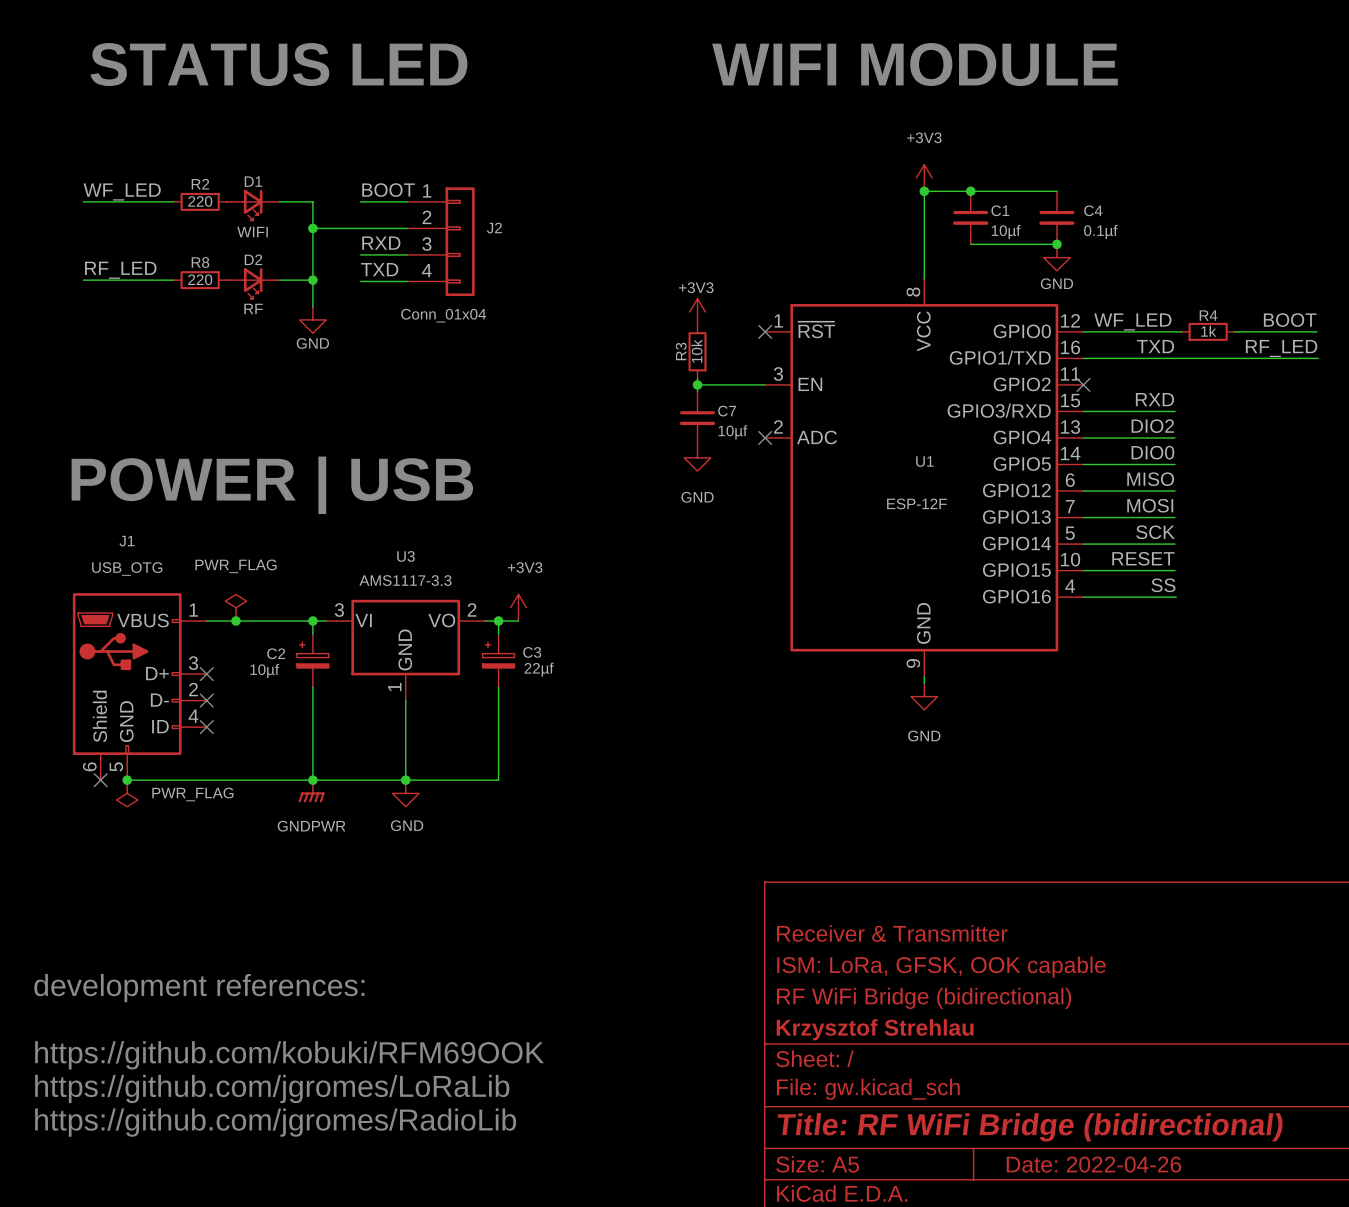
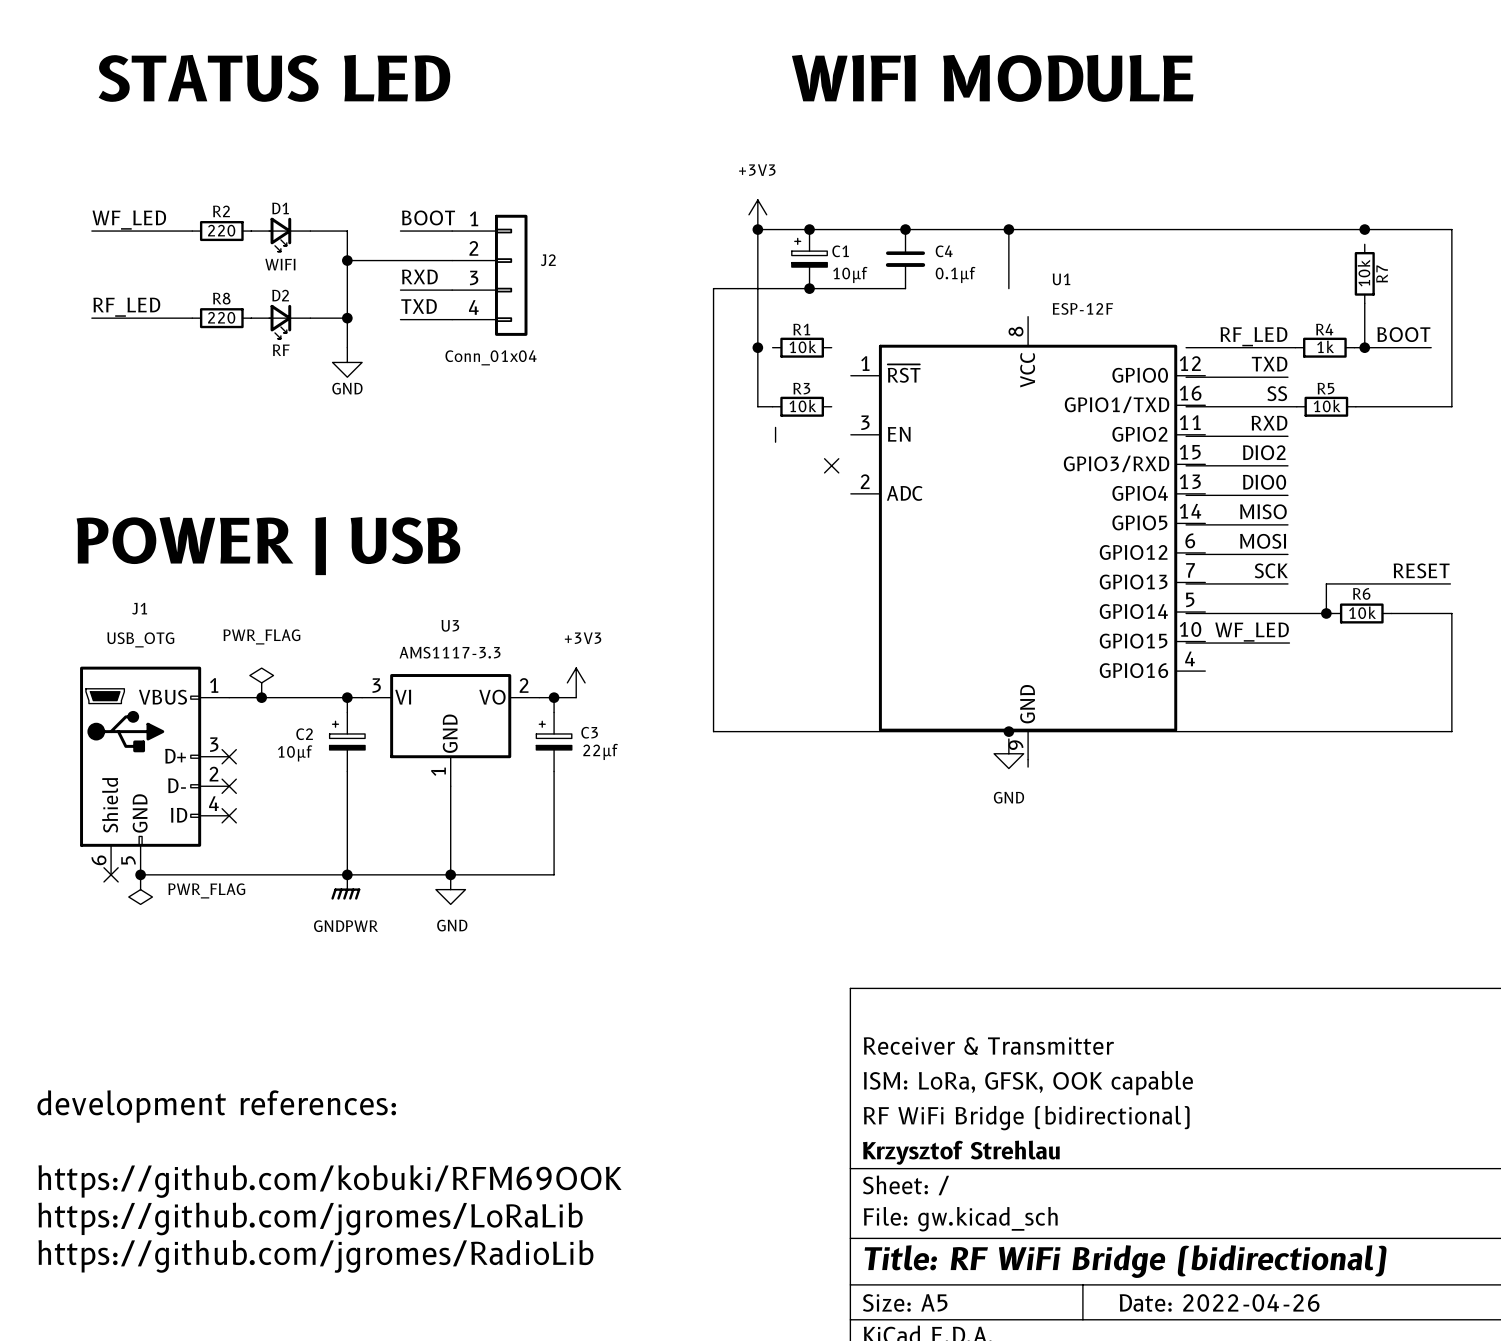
power symbol: +3V3 (924, 178) -> none
power symbol: none -> +3V3 (757, 214)
junction position: (924, 191) -> (1008, 229)
C1 symbol: [953, 191, 989, 245] -> [791, 229, 828, 289]
junction: (970, 191) -> none
wire: (1056, 191) (924, 191) (924, 278) -> none
junction: none -> (757, 229)
junction: none -> (809, 229)
junction: none -> (905, 229)
wire: none -> (1008, 229) (1008, 288)
junction: none -> (1364, 229)
C4 position: (1056, 217) -> (905, 259)
R7: none -> 10k (1364, 273)
wire: (970, 244) (1056, 244) -> none
junction: (1056, 244) -> none
junction: none -> (809, 288)
wire: none -> (905, 288) (713, 288) (713, 731) (1451, 731) (1451, 613) (1391, 613)
power symbol: GND (1056, 257) -> none
wire: none -> (1364, 303) (1364, 347)
junction: none -> (757, 347)
R1: none -> 10k (802, 347)
wire: none -> (1354, 347) (1431, 347)
junction: none -> (1364, 347)
power symbol: +3V3 (697, 311) -> none
label position: BOOT (1290, 320) -> BOOT (1403, 334)
label position: WF_LED (1132, 321) -> WF_LED (1252, 632)
no-connect mark: (765, 331) -> none
wire: (1083, 331) (1181, 331) -> (1186, 347) (1295, 347)
R4 position: (1208, 331) -> (1324, 347)
wire: (1234, 331) (1316, 331) -> none
label position: TXD (1155, 346) -> TXD (1269, 364)
label position: RF_LED (1281, 348) -> RF_LED (1253, 336)
R3 rotation: 0° (697, 351) -> 90° clockwise (802, 406)
wire: (1083, 358) (1318, 358) -> none
wire: none -> (772, 406) (757, 406) (757, 229) (1451, 229) (1451, 406) (1355, 406)
wire: none -> (1186, 406) (1296, 406)
R5: none -> 10k (1326, 406)
wire: (697, 384) (765, 384) -> none
junction: (697, 384) -> none
no-connect mark: (1083, 384) -> none
label position: RXD (1154, 399) -> RXD (1269, 423)
wire: (1083, 411) (1174, 411) -> (1186, 436) (1287, 436)
C7: 10µf (697, 418) -> none
label position: DIO2 (1152, 426) -> DIO2 (1264, 452)
no-connect mark position: (765, 437) -> (831, 465)
wire: (1083, 437) (1174, 437) -> (1186, 465) (1287, 465)
label position: DIO0 (1152, 452) -> DIO0 (1264, 482)
power symbol: GND (697, 457) -> none
U1 name position: U1 (924, 461) -> U1 (1061, 279)
wire: (1083, 464) (1174, 464) -> (1186, 495) (1287, 495)
label position: MISO (1150, 479) -> MISO (1263, 511)
wire: (1083, 491) (1174, 491) -> (1186, 524) (1287, 524)
U1 value position: ESP-12F (916, 503) -> ESP-12F (1082, 308)
label position: MOSI (1150, 505) -> MOSI (1263, 541)
wire: (1083, 517) (1174, 517) -> (1186, 554) (1287, 554)
wire: none -> (1450, 583) (1326, 583) (1326, 613)
label position: SCK (1155, 532) -> SCK (1271, 570)
wire: (1083, 544) (1174, 544) -> (1186, 583) (1287, 583)
wire: none -> (1186, 613) (1332, 613)
junction: none -> (1326, 613)
R6: none -> 10k (1361, 613)
label position: RESET (1143, 558) -> RESET (1421, 570)
wire: (1083, 570) (1174, 570) -> (1186, 377) (1287, 377)
label position: SS (1163, 585) -> SS (1277, 393)
wire: (1083, 597) (1176, 597) -> (1186, 643) (1289, 643)
junction: none -> (1008, 731)
power symbol position: GND (924, 696) -> GND (1008, 753)

